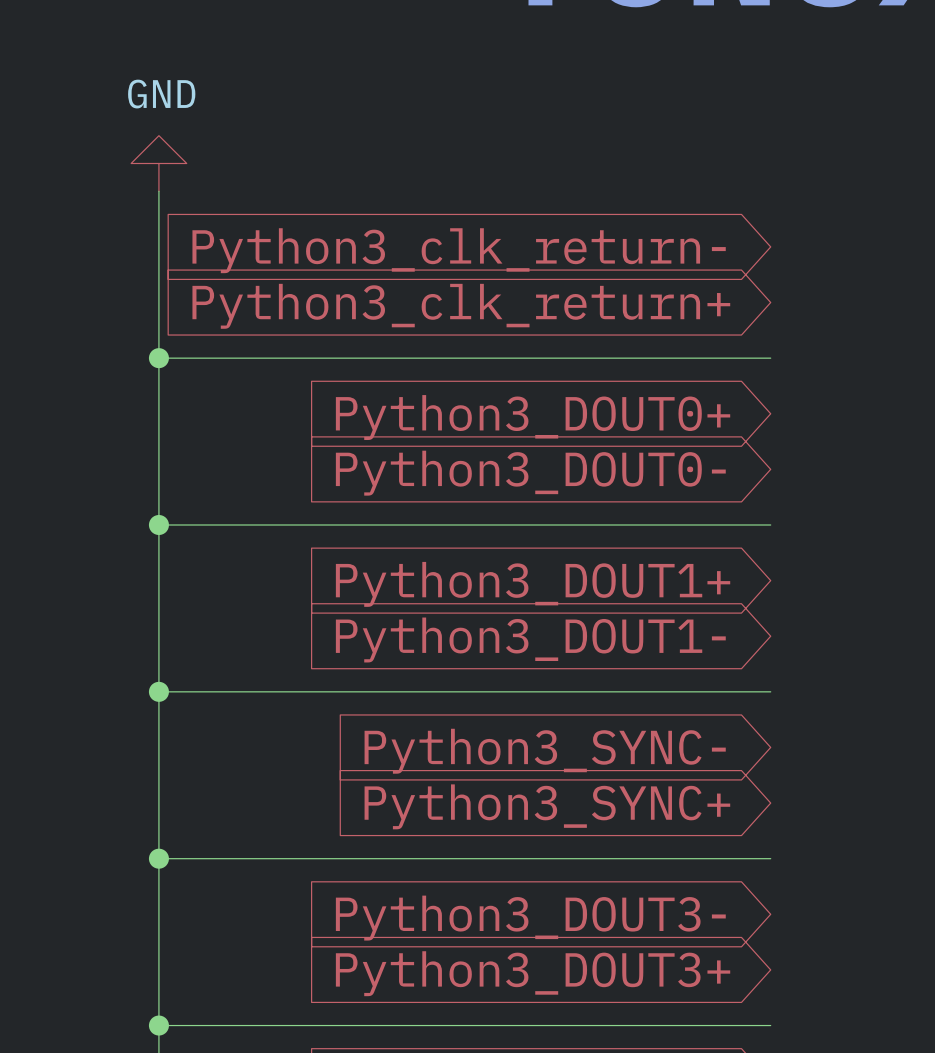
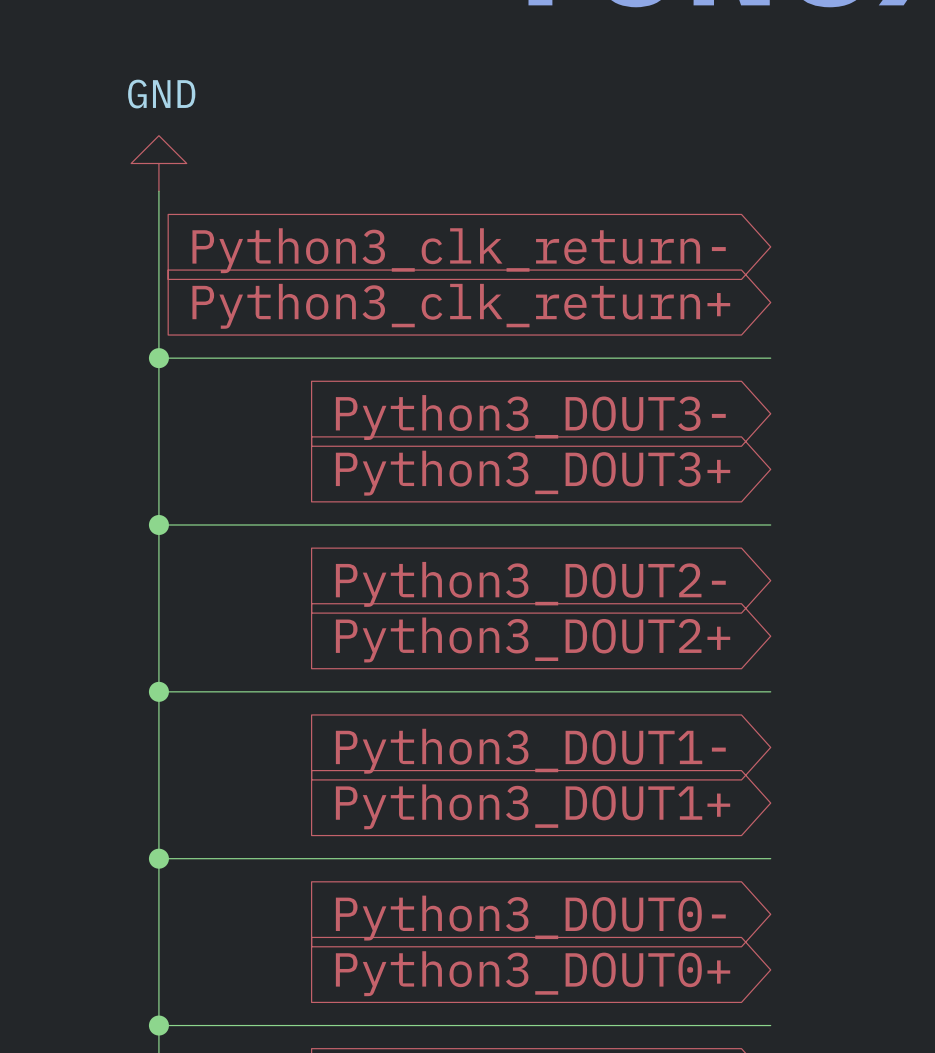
global label: Python3_DOUT0+ (533, 417) -> Python3_DOUT3- (530, 417)
global label: Python3_DOUT0- (530, 473) -> Python3_DOUT3+ (533, 473)
global label: Python3_DOUT1+ (533, 584) -> Python3_DOUT2- (530, 584)
global label: Python3_DOUT1- (530, 640) -> Python3_DOUT2+ (533, 640)
global label: Python3_SYNC- (545, 751) -> Python3_DOUT1- (530, 751)
global label: Python3_SYNC+ (547, 806) -> Python3_DOUT1+ (533, 806)
global label: Python3_DOUT3- (530, 918) -> Python3_DOUT0- (530, 918)
global label: Python3_DOUT3+ (533, 973) -> Python3_DOUT0+ (533, 973)

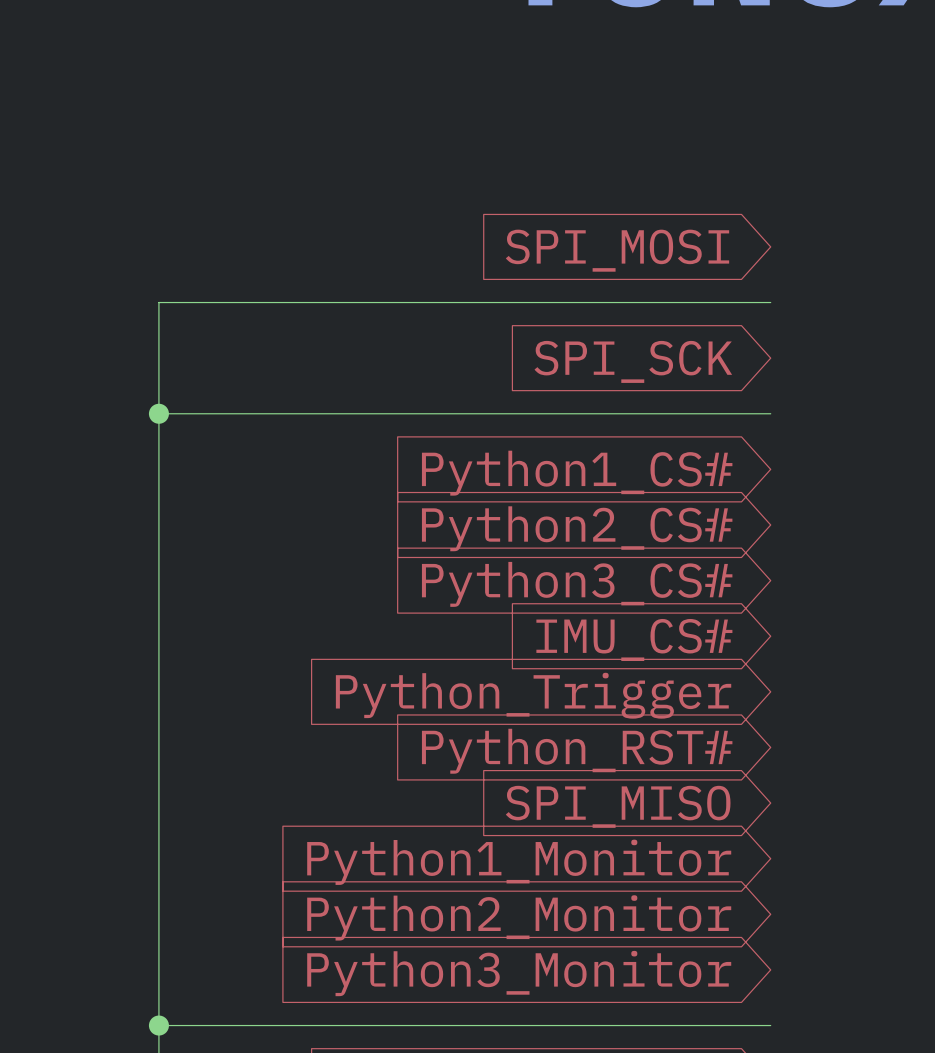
power symbol: GND (158, 163) -> none
wire: (158, 191) (158, 302) -> (770, 302) (158, 302)
global label: Python3_clk_return- (459, 250) -> SPI_MOSI (617, 250)
global label: Python3_clk_return+ (461, 306) -> none
wire: (158, 358) (770, 358) -> (158, 413) (770, 413)
junction: (158, 358) -> none
global label: none -> SPI_SCK (633, 361)
junction: none -> (158, 413)
global label: Python3_DOUT3- (530, 417) -> none
global label: Python3_DOUT3+ (533, 473) -> Python1_CS# (577, 473)
wire: (158, 525) (770, 525) -> none
junction: (158, 525) -> none
global label: none -> Python2_CS# (577, 528)
global label: Python3_DOUT2- (530, 584) -> Python3_CS# (577, 584)
global label: Python3_DOUT2+ (533, 640) -> IMU_CS# (634, 639)
wire: (158, 691) (770, 691) -> none
junction: (158, 691) -> none
global label: none -> Python_Trigger (533, 695)
global label: Python3_DOUT1- (530, 751) -> Python_RST# (577, 751)
global label: Python3_DOUT1+ (533, 806) -> SPI_MISO (618, 806)
wire: (158, 858) (770, 858) -> none
junction: (158, 858) -> none
global label: none -> Python1_Monitor (519, 862)
global label: Python3_DOUT0- (530, 918) -> Python2_Monitor (519, 917)
global label: Python3_DOUT0+ (533, 973) -> Python3_Monitor (519, 973)

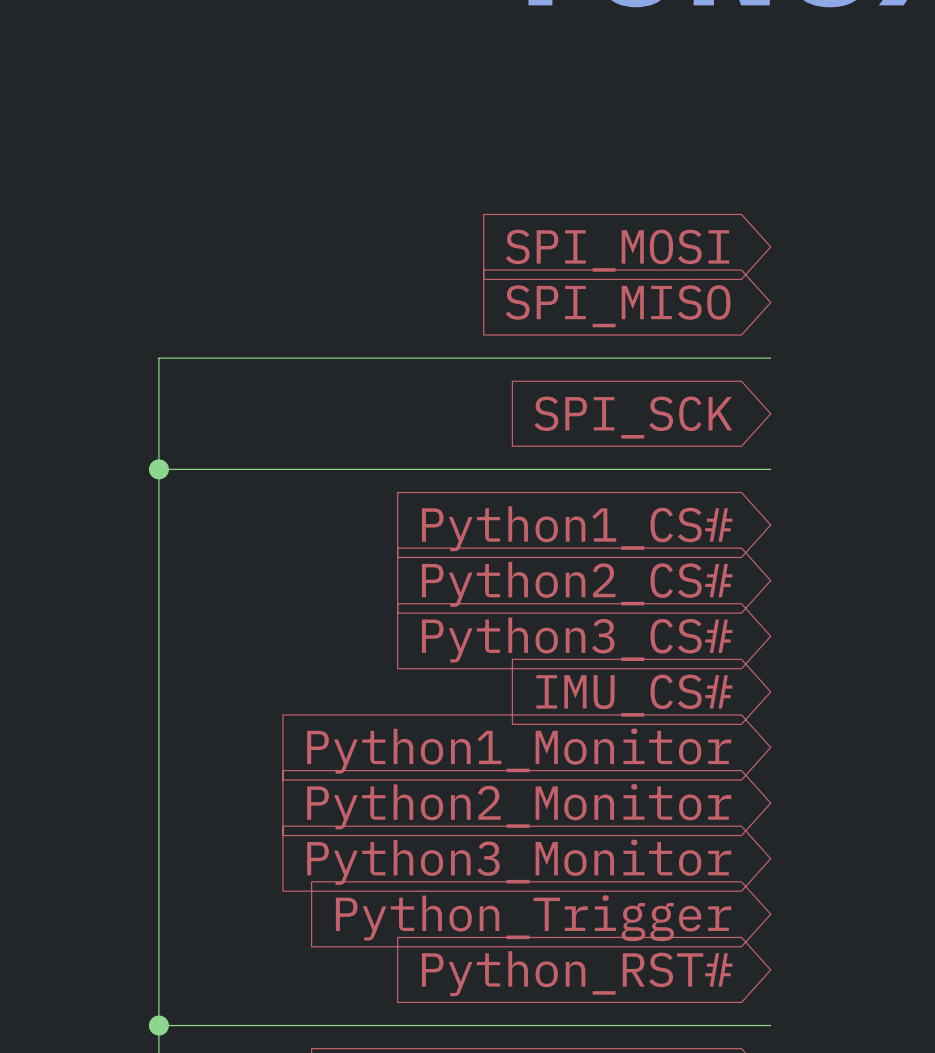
wire: (770, 302) (158, 302) (158, 358) -> (770, 358) (158, 358)
global label: none -> SPI_MISO (618, 306)
global label position: SPI_SCK (633, 361) -> SPI_SCK (633, 417)
wire: (158, 413) (770, 413) -> (158, 469) (770, 469)
junction position: (158, 413) -> (158, 469)
global label: Python1_CS# (577, 473) -> none
global label: Python2_CS# (577, 528) -> Python1_CS# (577, 528)
global label: Python3_CS# (577, 584) -> Python2_CS# (577, 584)
global label: IMU_CS# (634, 639) -> Python3_CS# (577, 640)
global label: Python_Trigger (533, 695) -> IMU_CS# (634, 695)
global label: Python_RST# (577, 751) -> Python1_Monitor (519, 751)
global label: SPI_MISO (618, 806) -> Python2_Monitor (519, 806)
global label: Python1_Monitor (519, 862) -> Python3_Monitor (519, 862)
global label: Python2_Monitor (519, 917) -> Python_Trigger (533, 918)
global label: Python3_Monitor (519, 973) -> Python_RST# (577, 973)

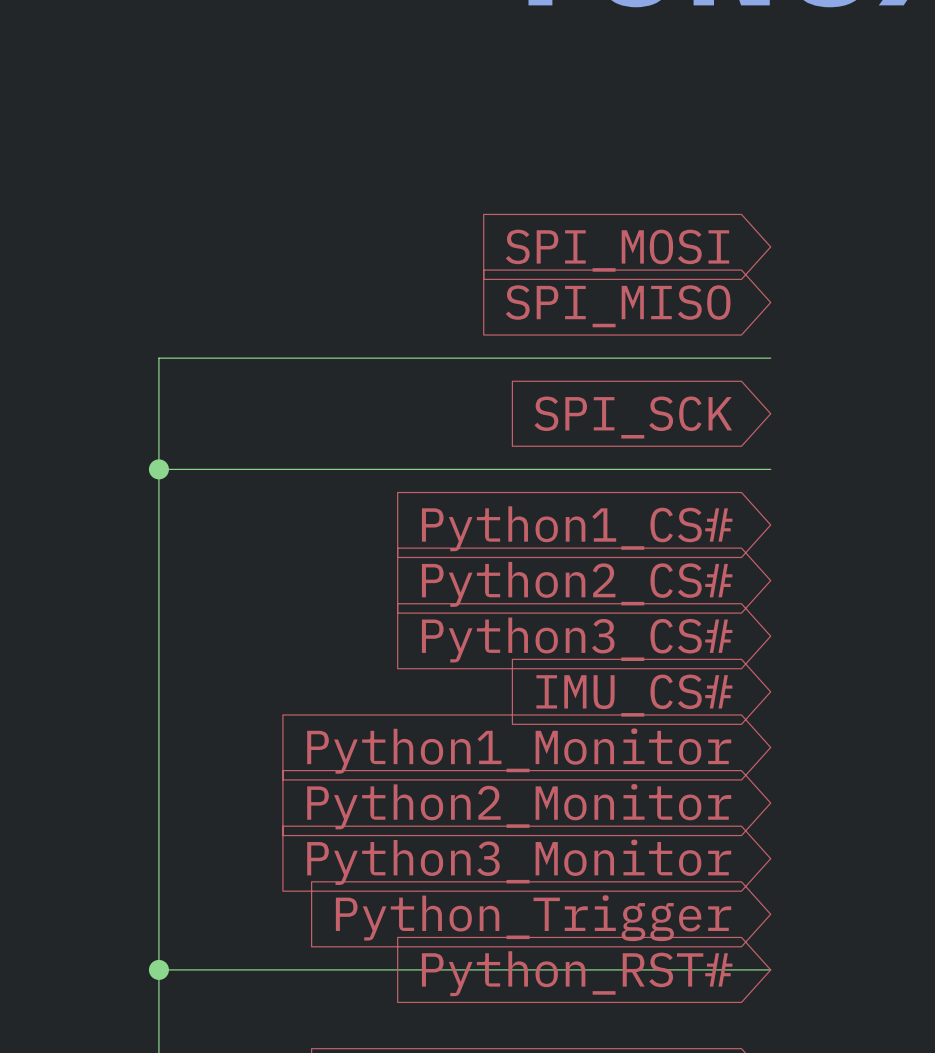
wire: (158, 1025) (770, 1025) -> (158, 969) (770, 969)
junction position: (158, 1025) -> (158, 969)

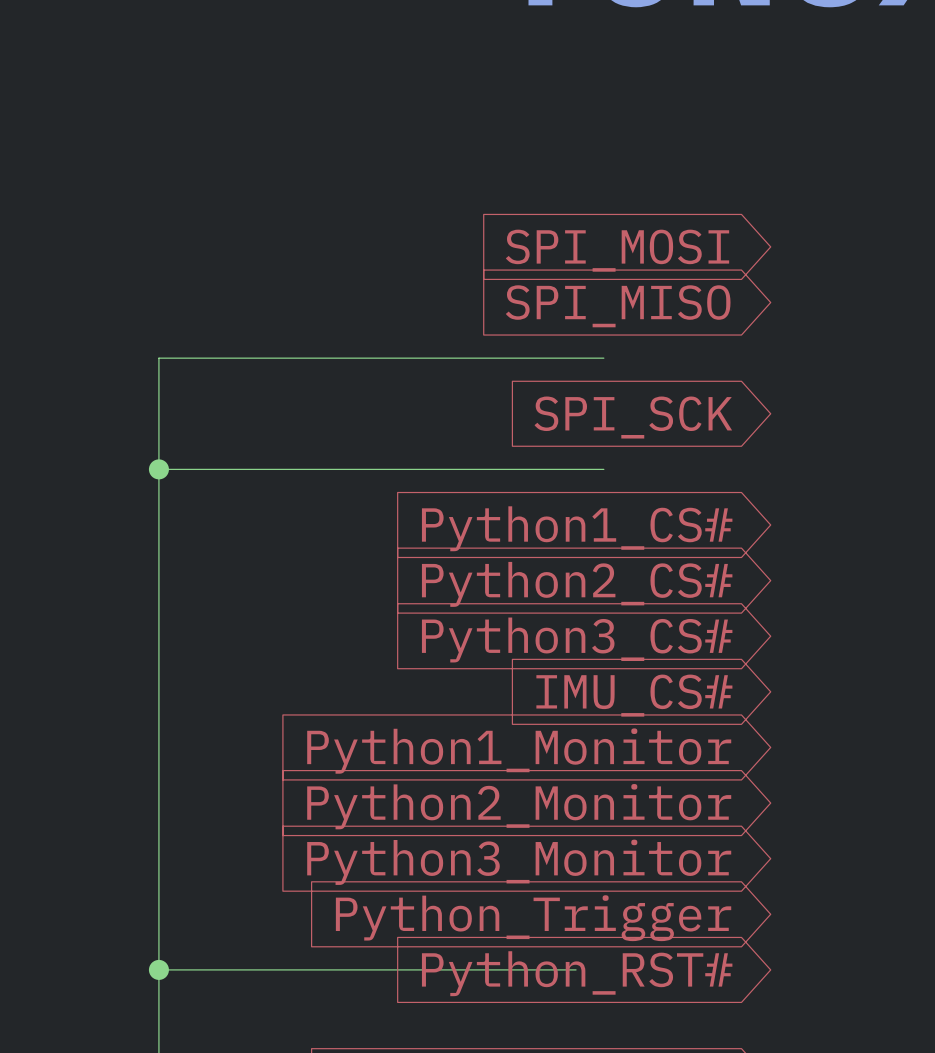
wire: (603, 358) (770, 358) -> none
wire: (603, 469) (770, 469) -> none
wire: (576, 969) (770, 969) -> none

